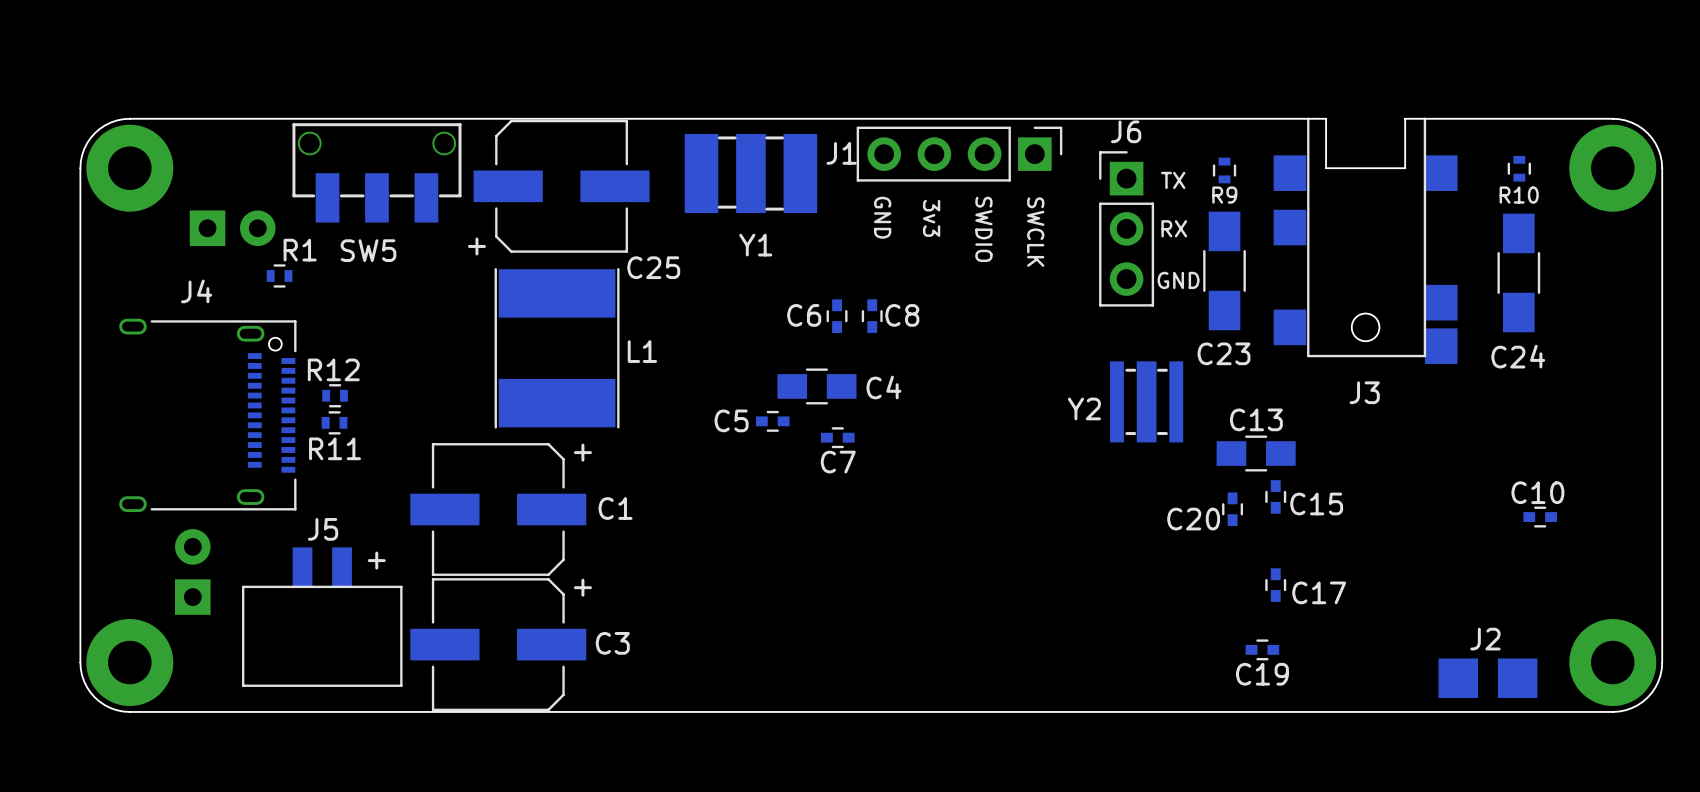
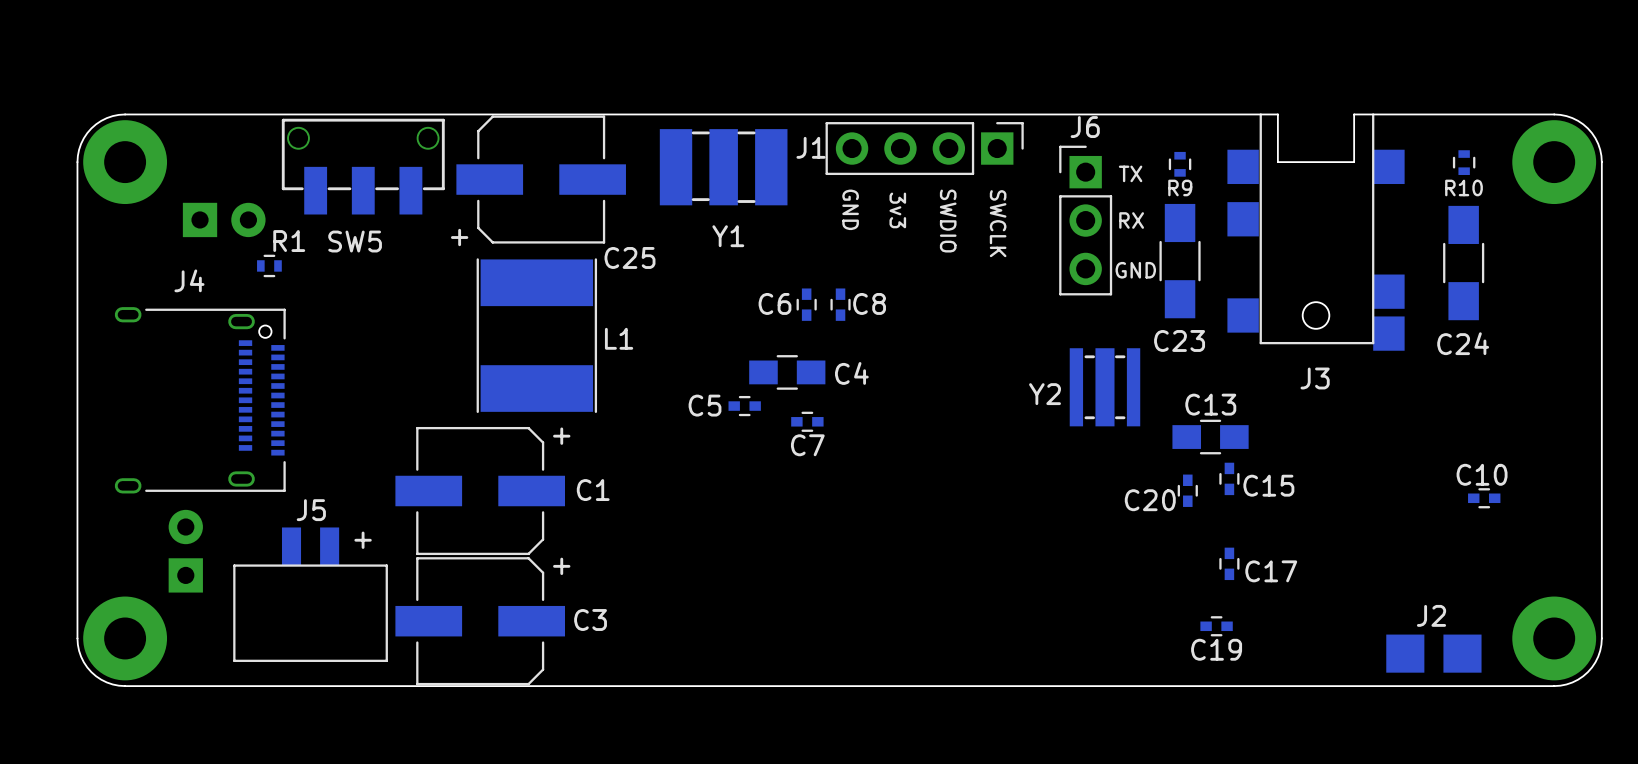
R12: (335, 395) -> none
R11: (334, 422) -> none

